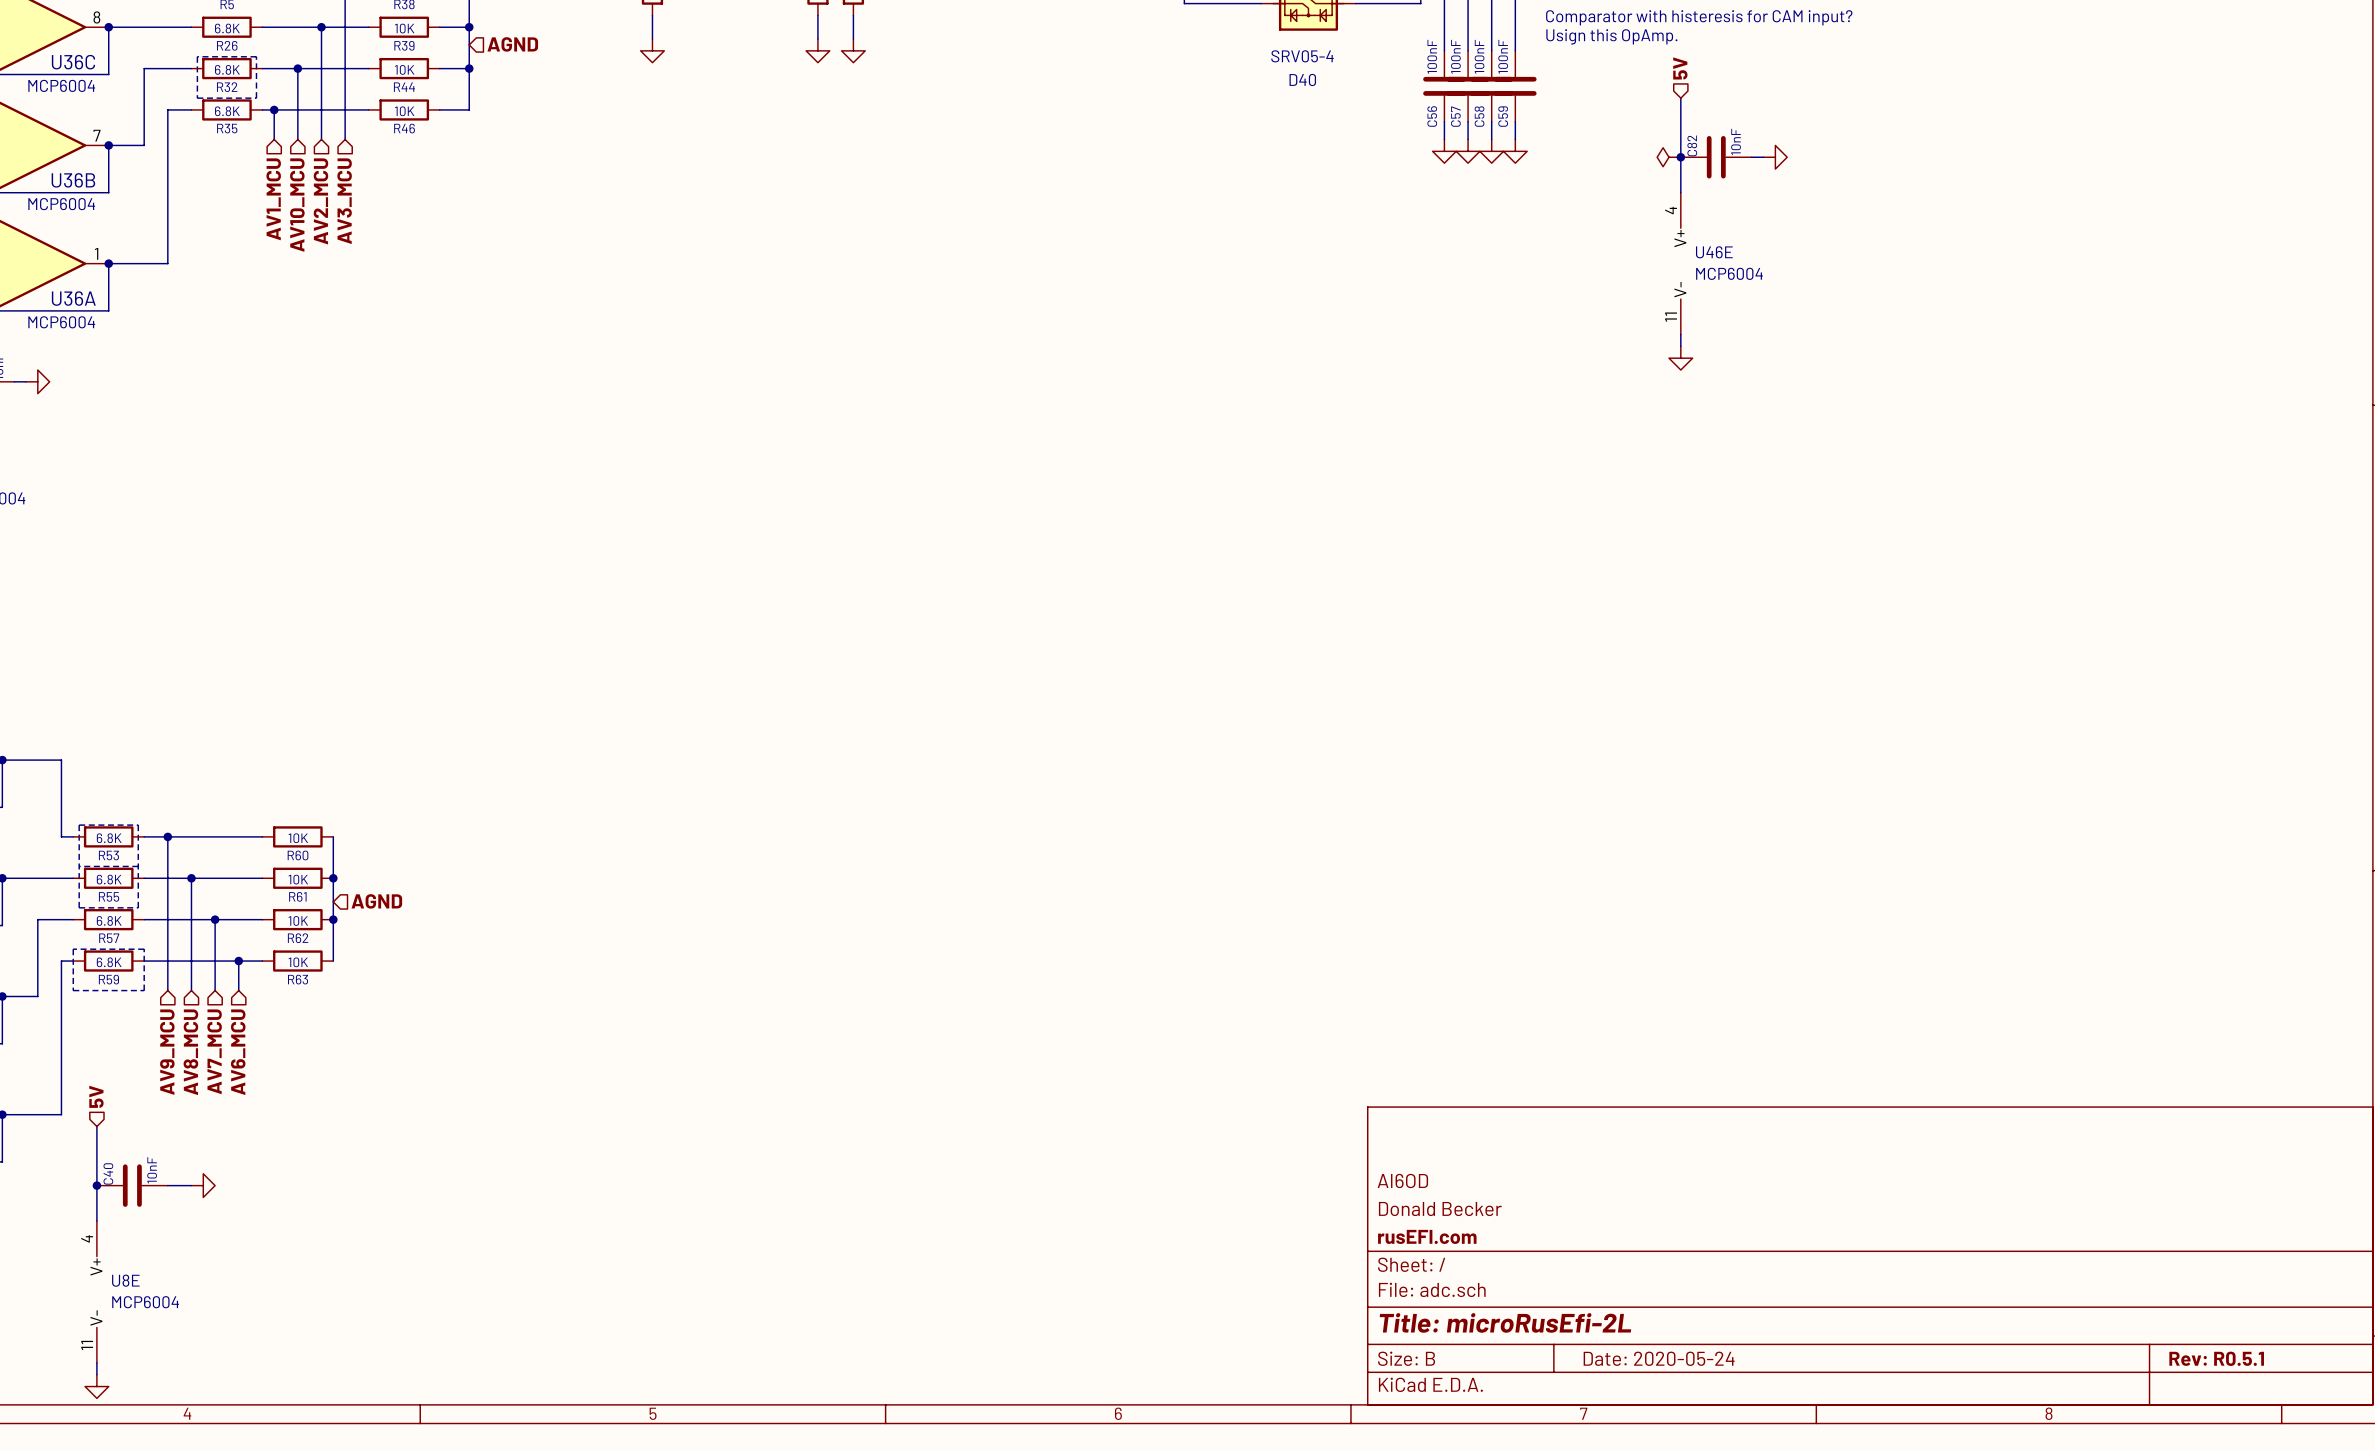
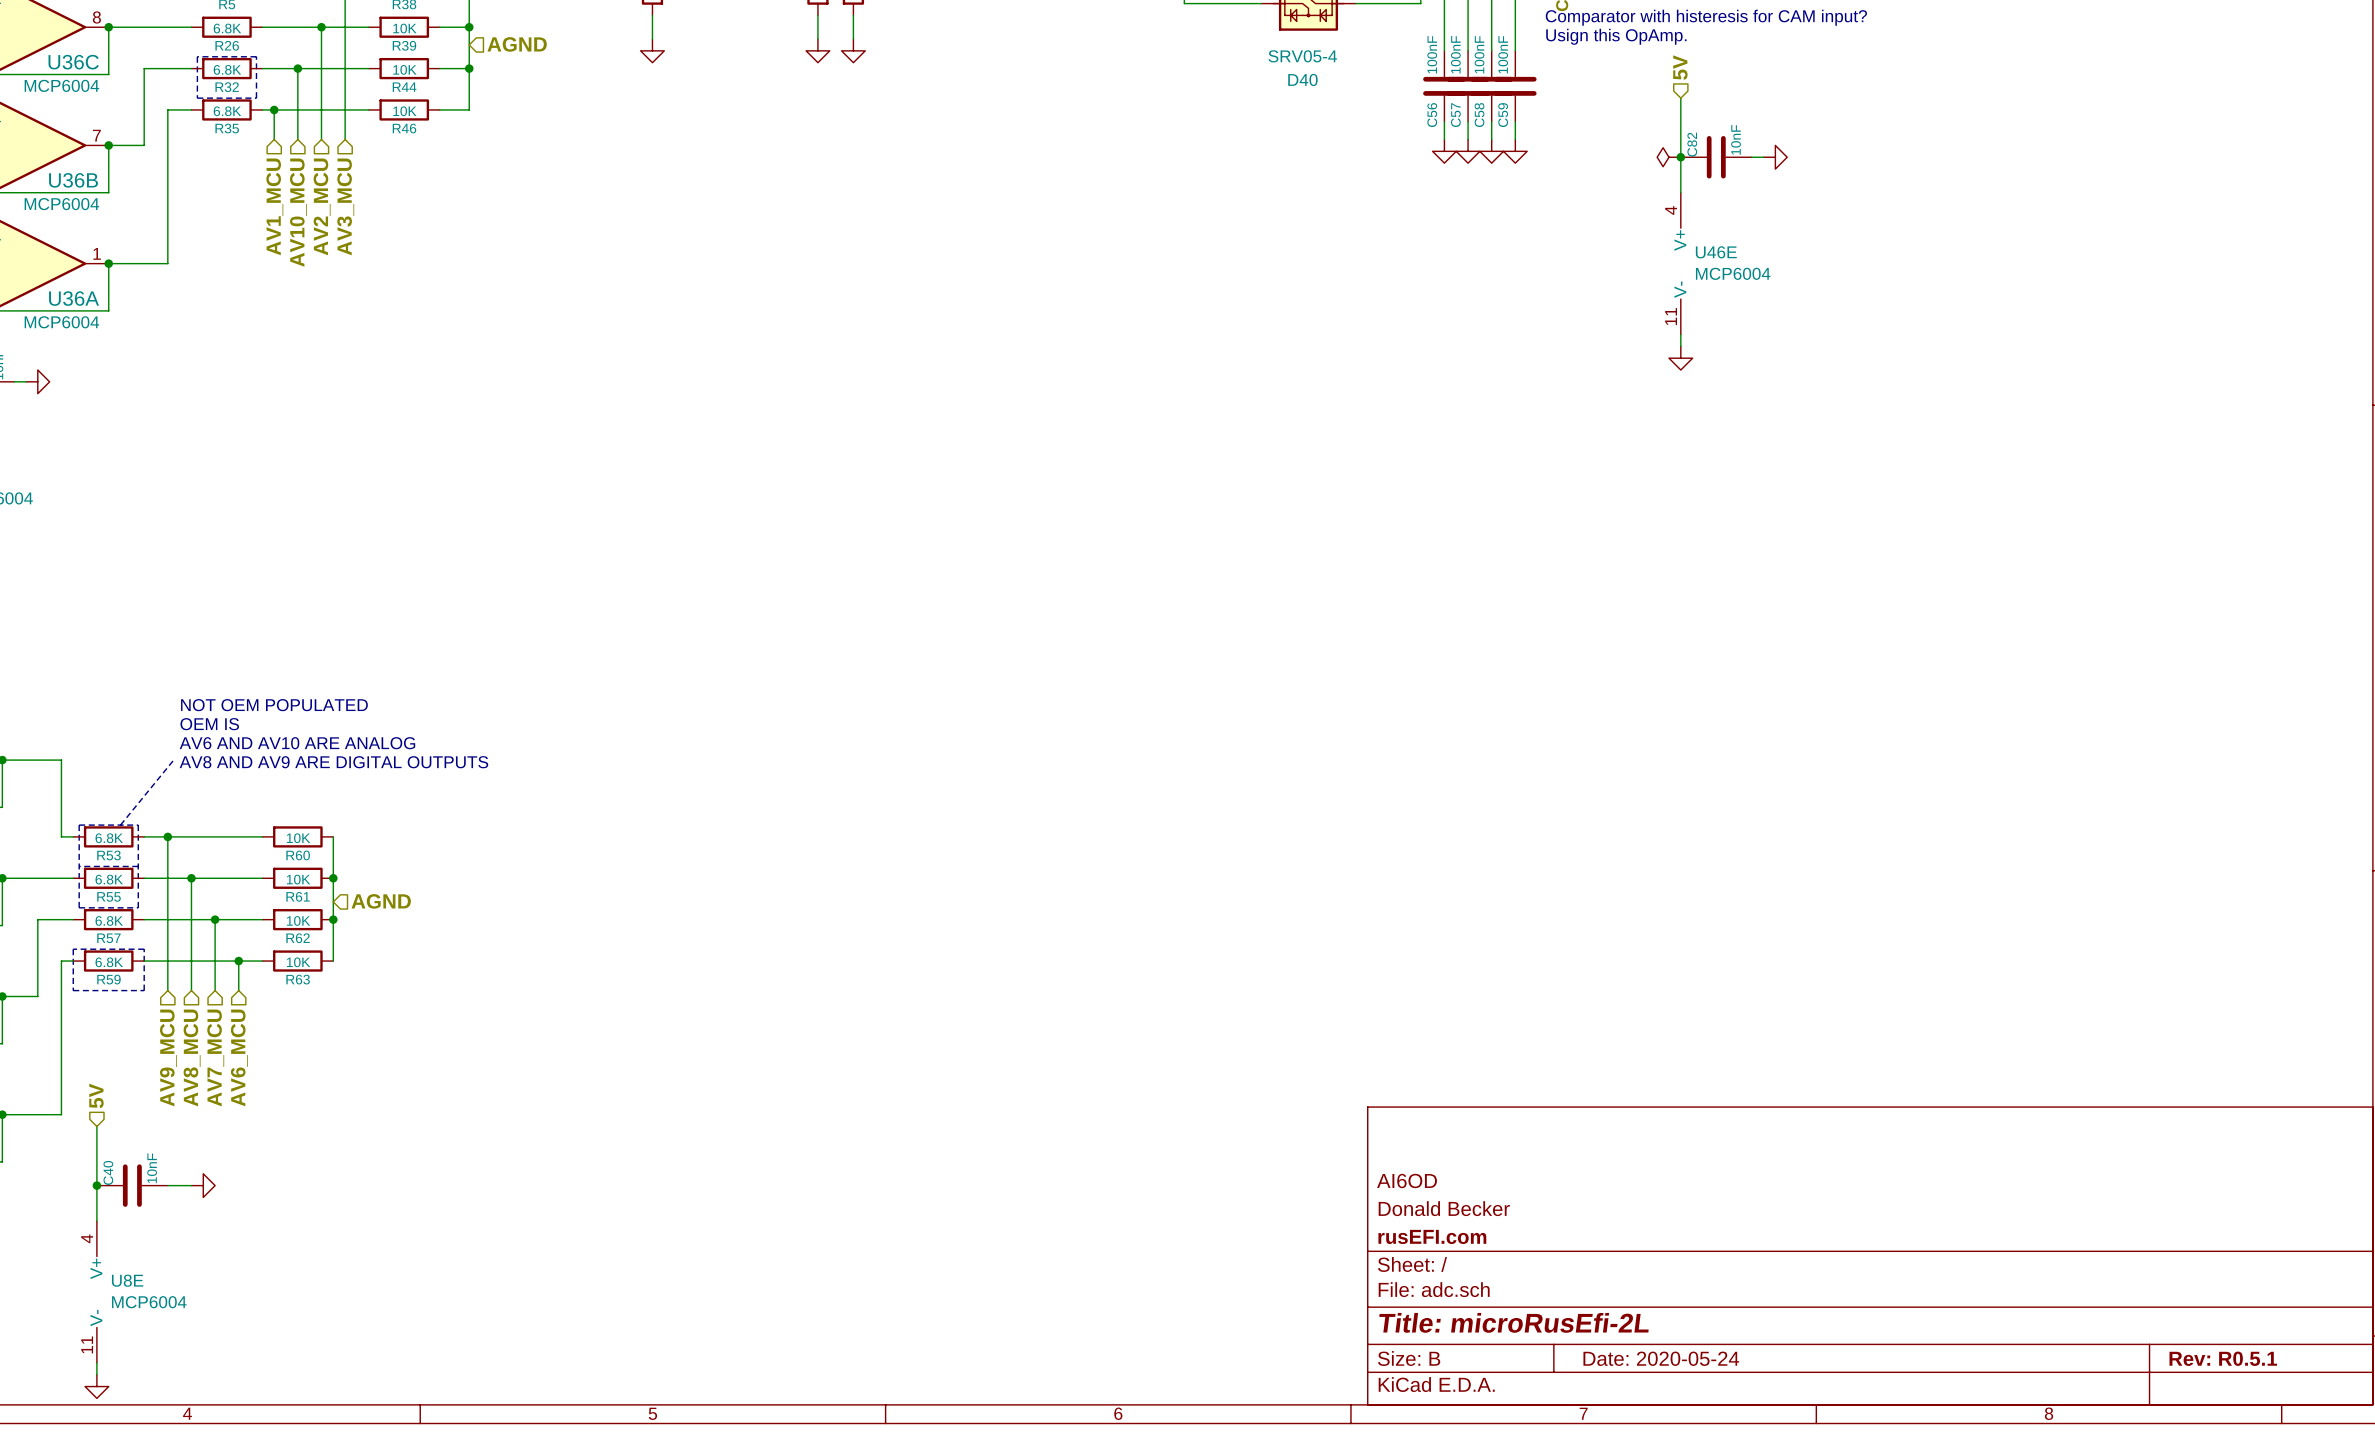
text: none -> NOT OEM POPULATED (274, 705)
text: none -> OEM IS (209, 724)
text: none -> AV6 AND AV10 ARE ANALOG (297, 743)
line: none -> (173, 760) (120, 825)
text: none -> AV8 AND AV9 ARE DIGITAL OUTPUTS (333, 762)

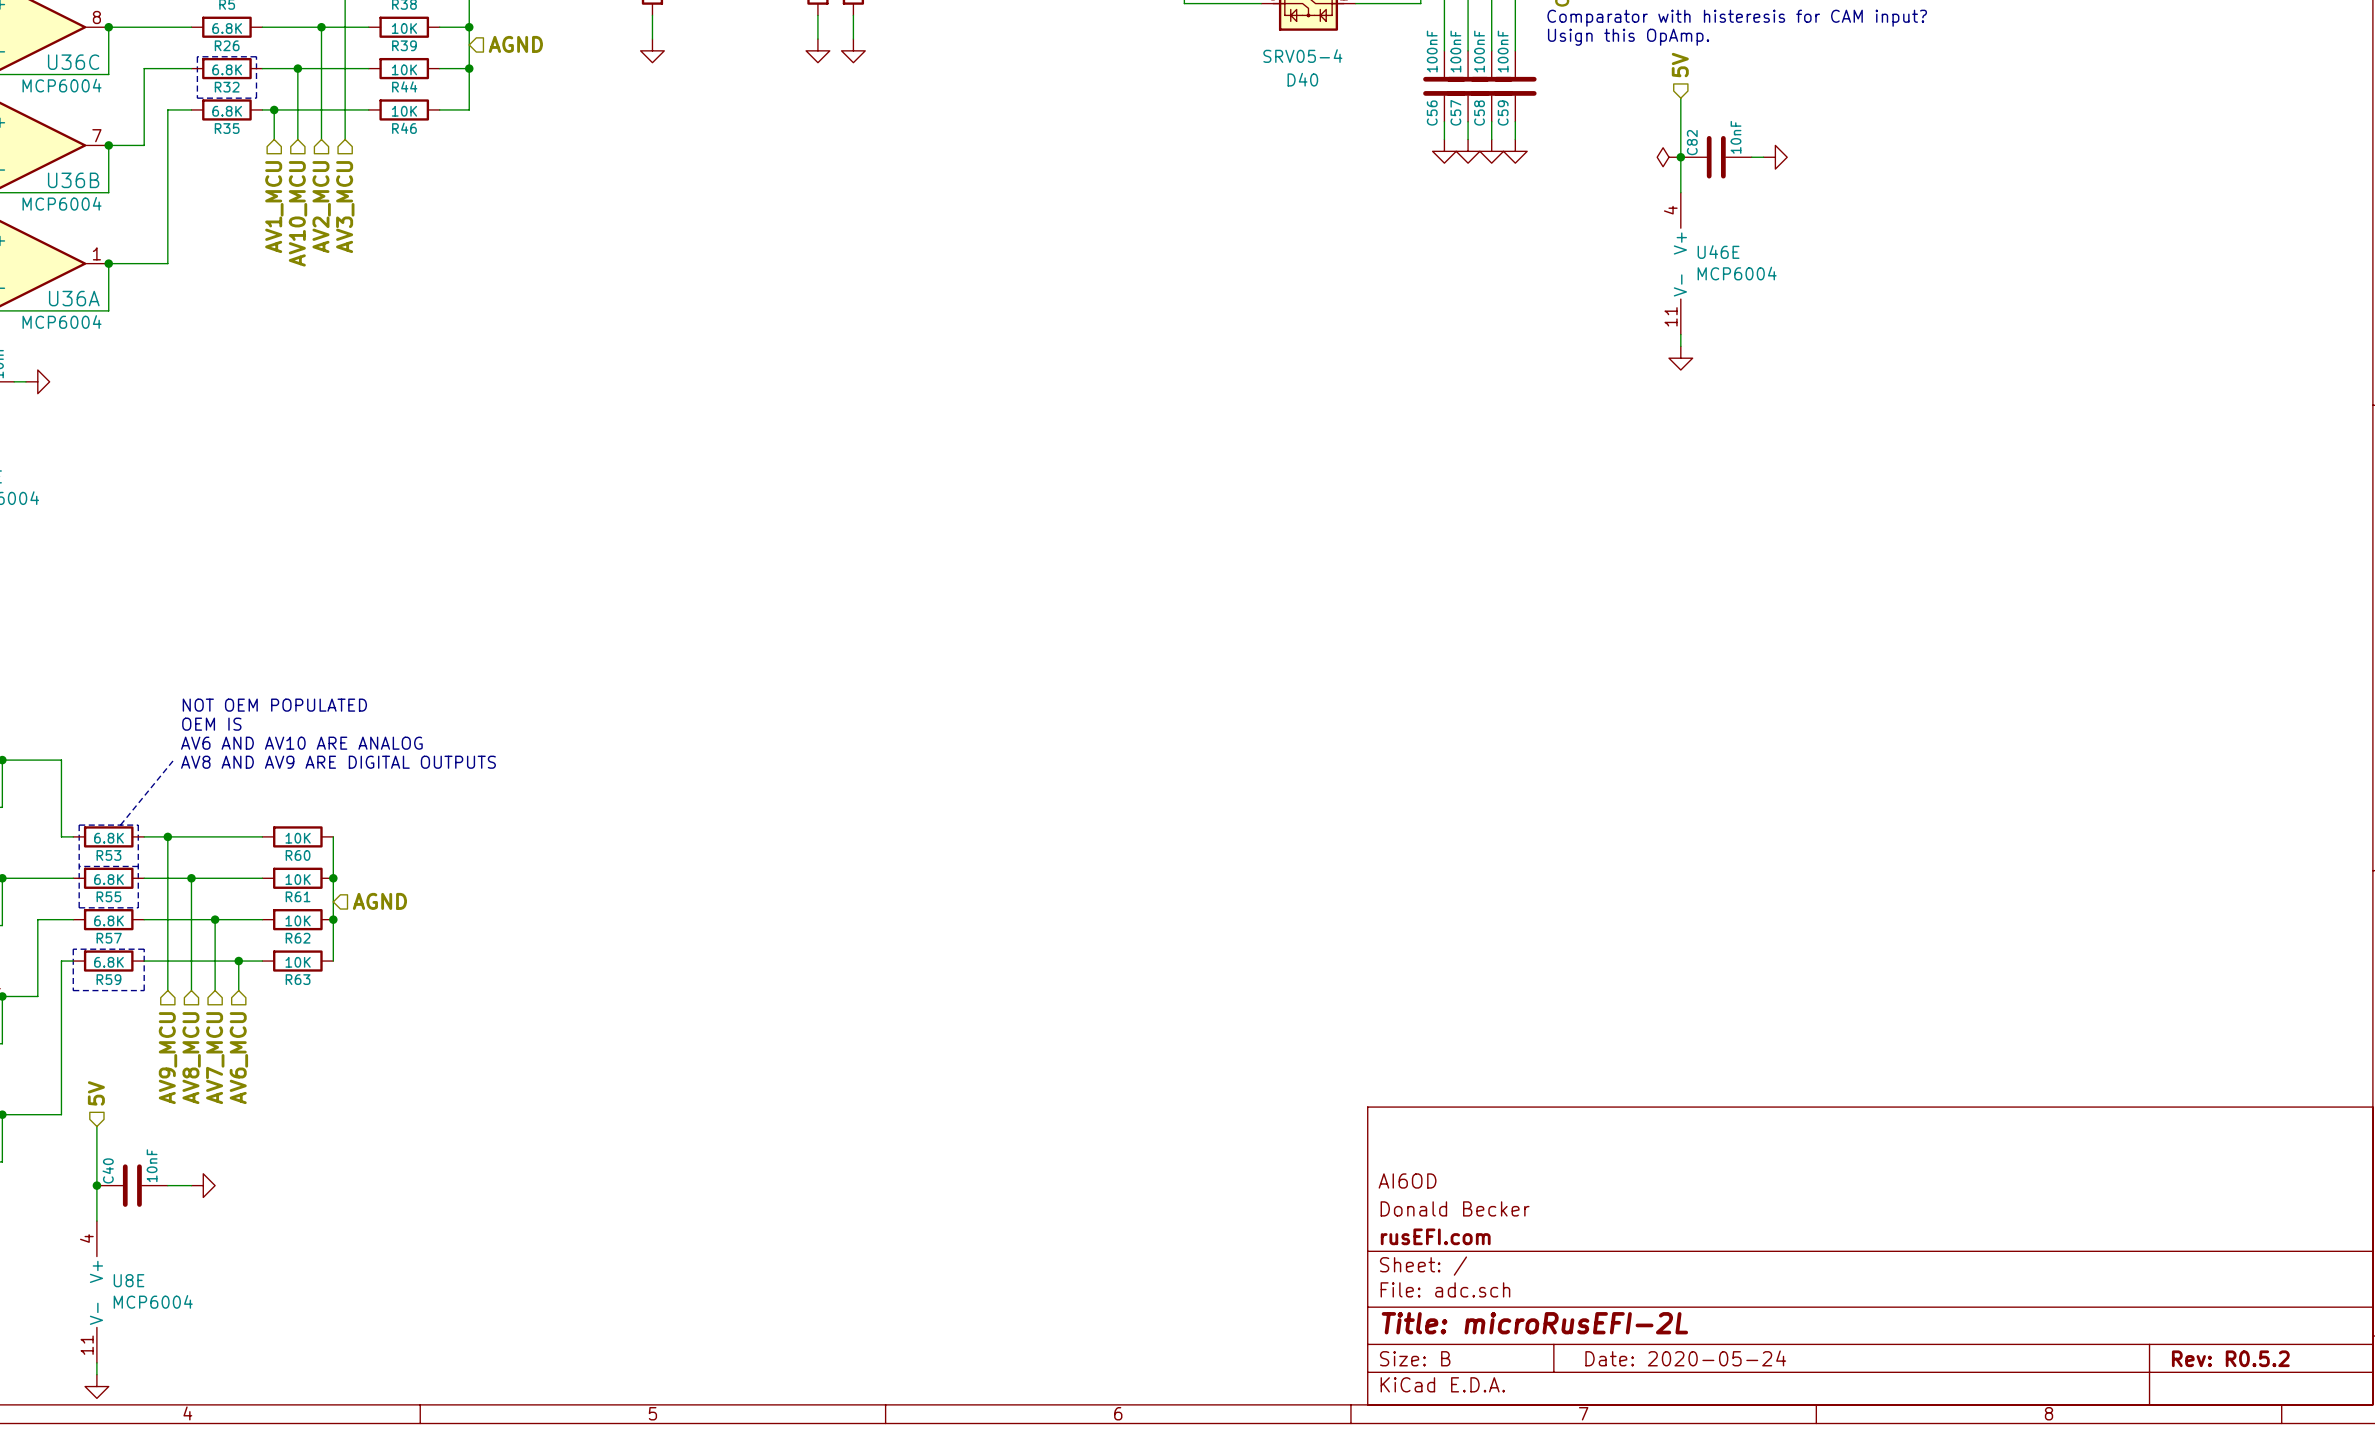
title block: Title: microRusEfi-2L (1513, 1322) -> Title: microRusEFI-2L (1534, 1323)
title block: Rev: R0.5.1 (2223, 1358) -> Rev: R0.5.2 (2230, 1358)

